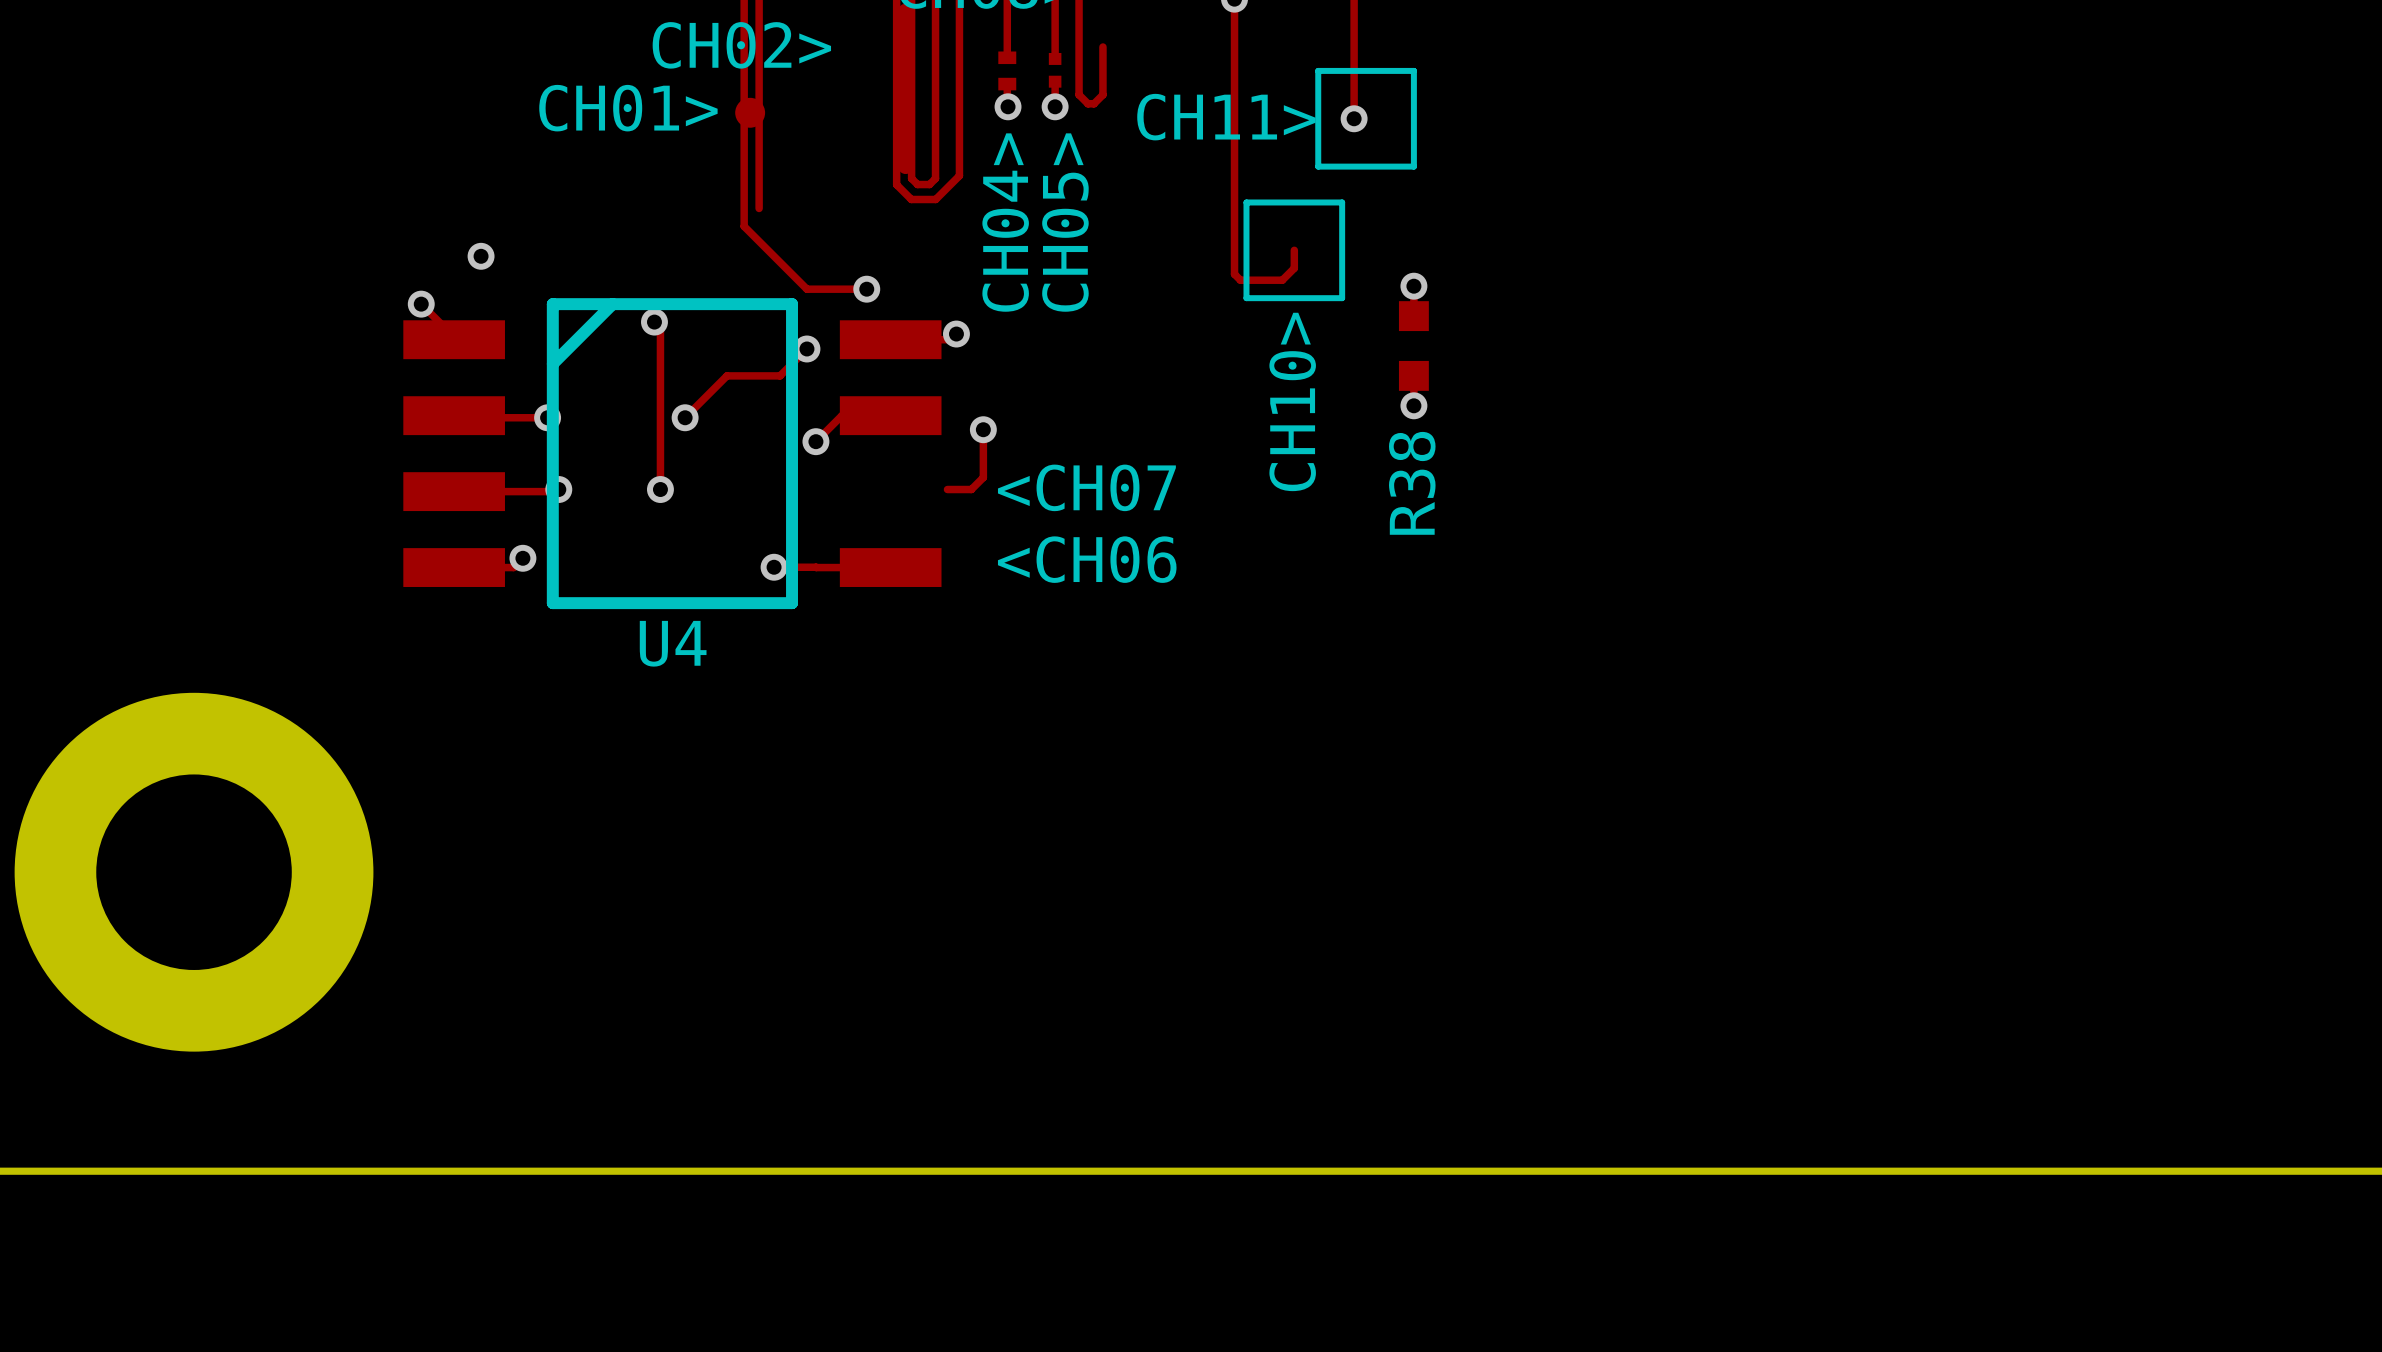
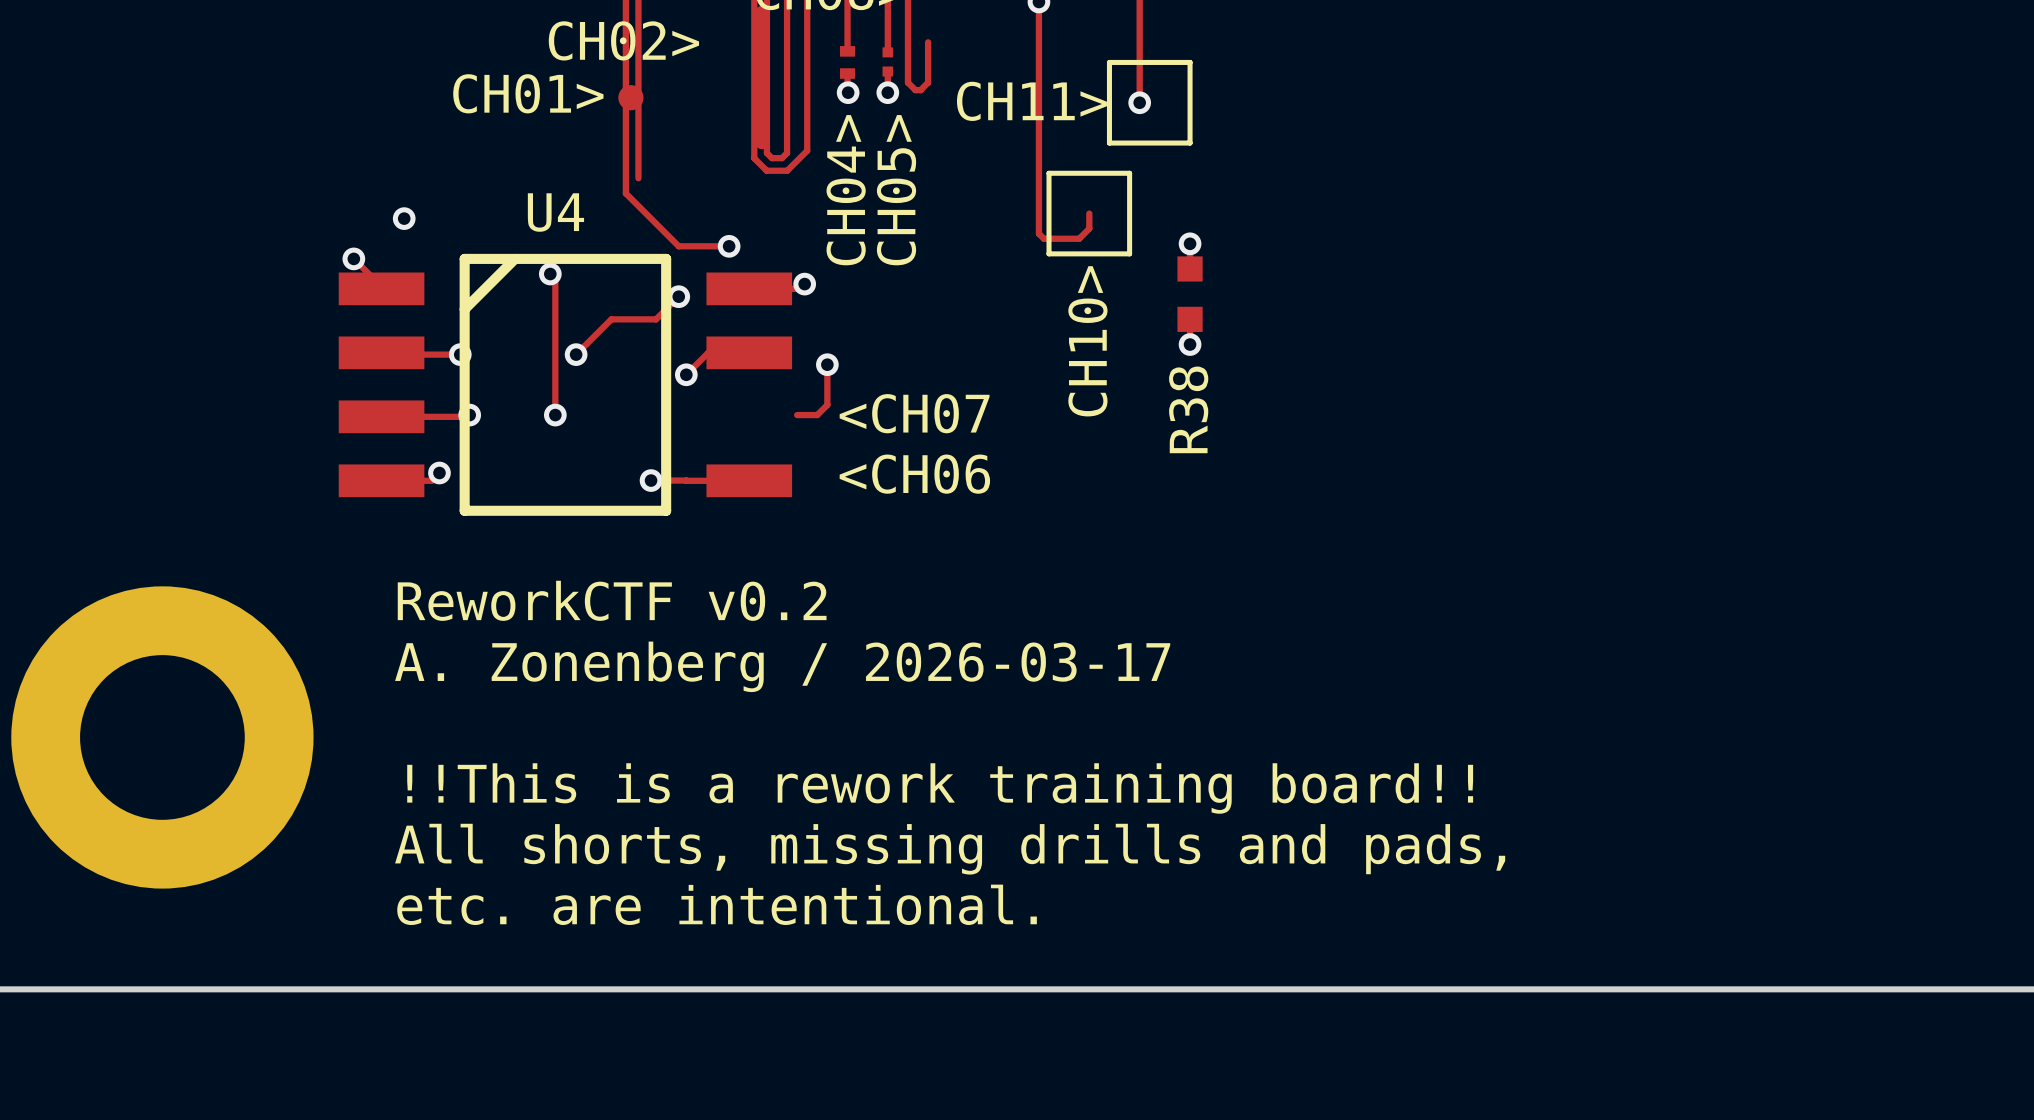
U4 name position: U4 (673, 643) -> U4 (555, 212)
text: none -> ReworkCTF v0.2 (612, 600)
text: none -> A. Zonenberg / 2026-03-17 (782, 666)
text: none -> !!This is a rework training board!! (940, 788)
text: none -> All shorts, missing drills and pads, (950, 849)
text: none -> etc. are intentional. (717, 904)

